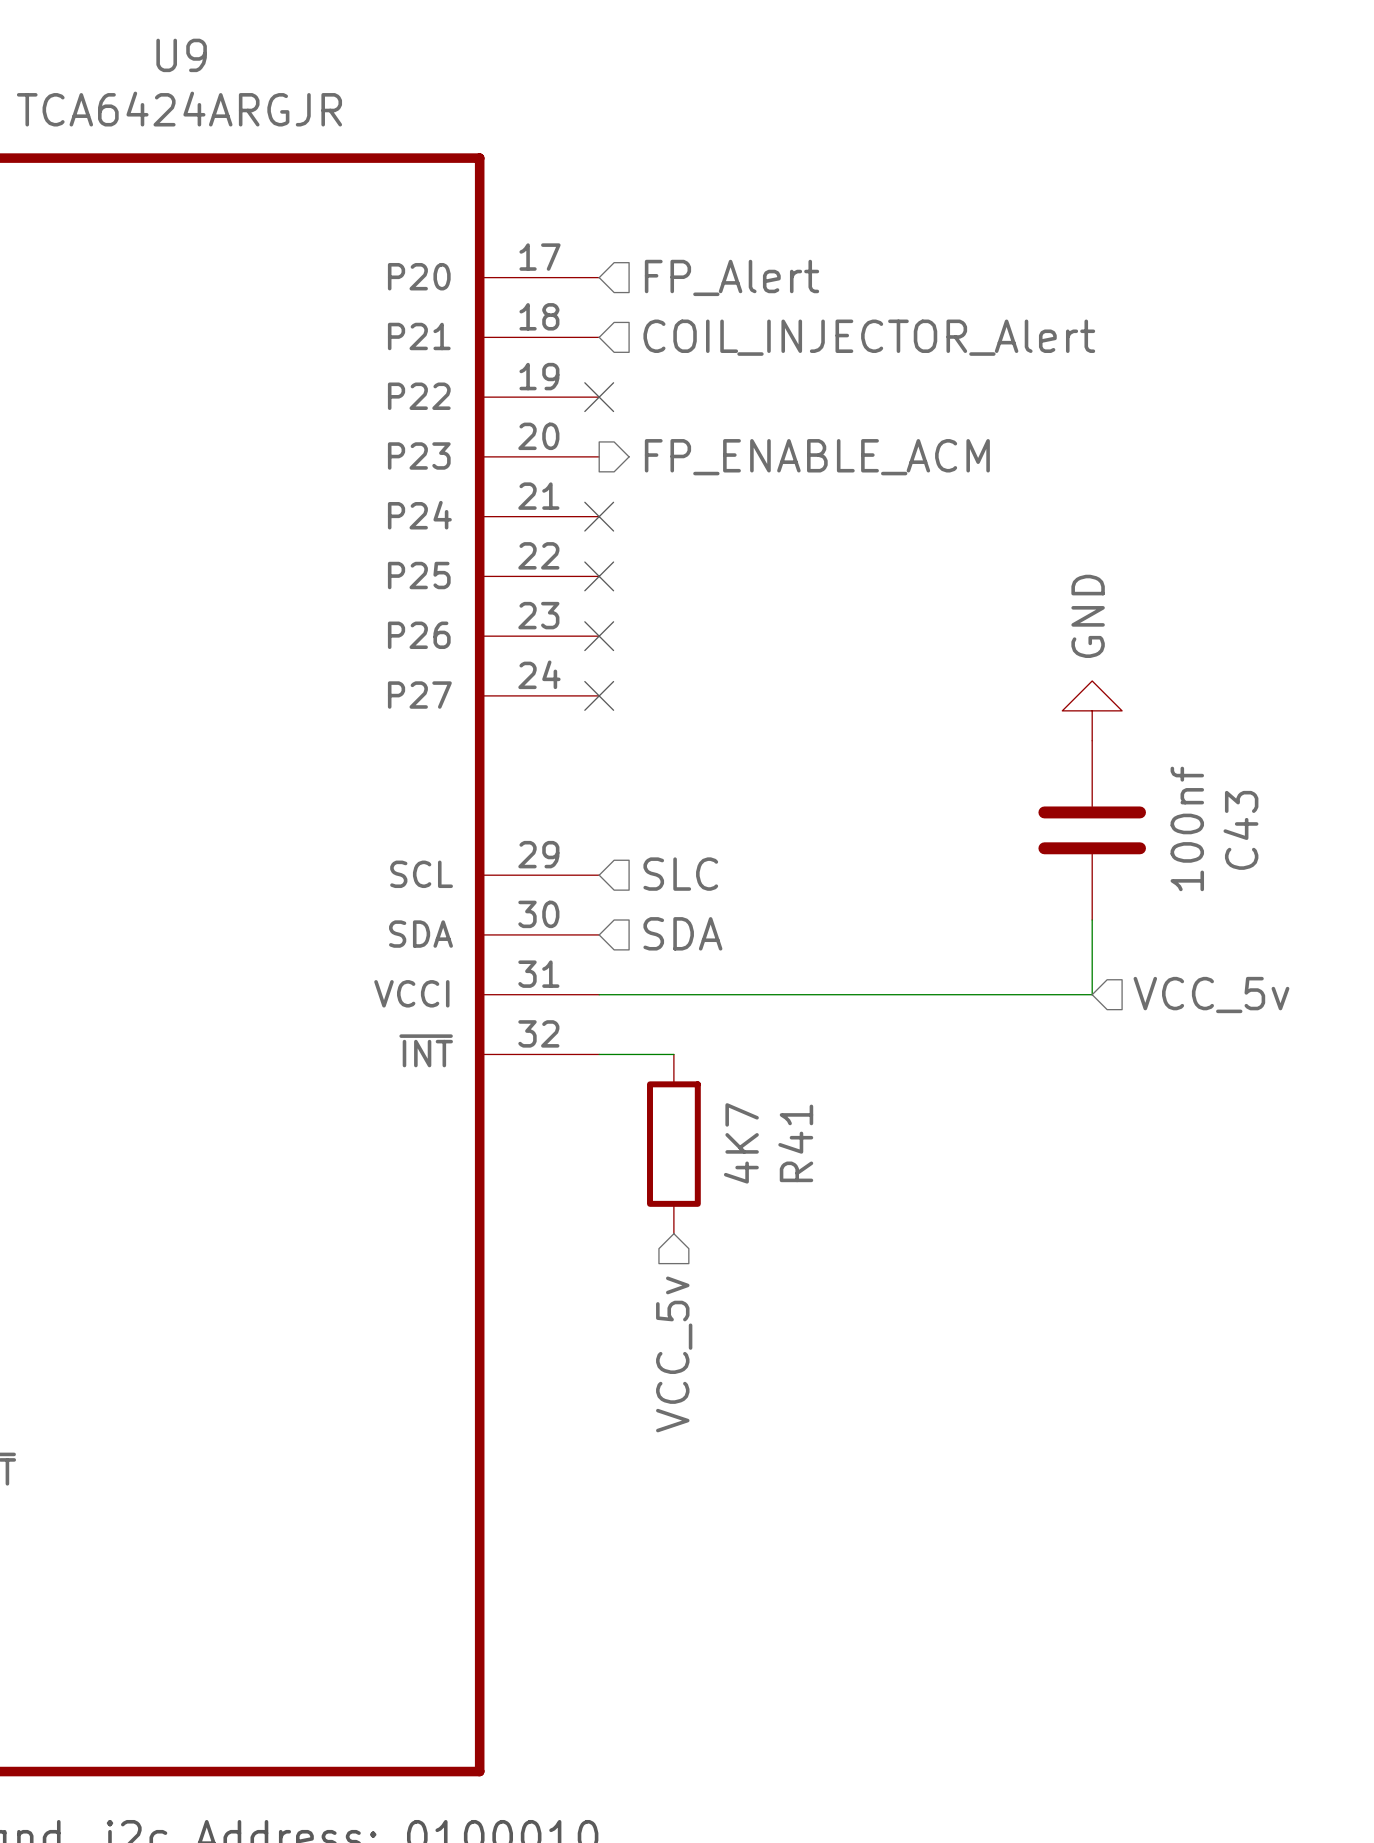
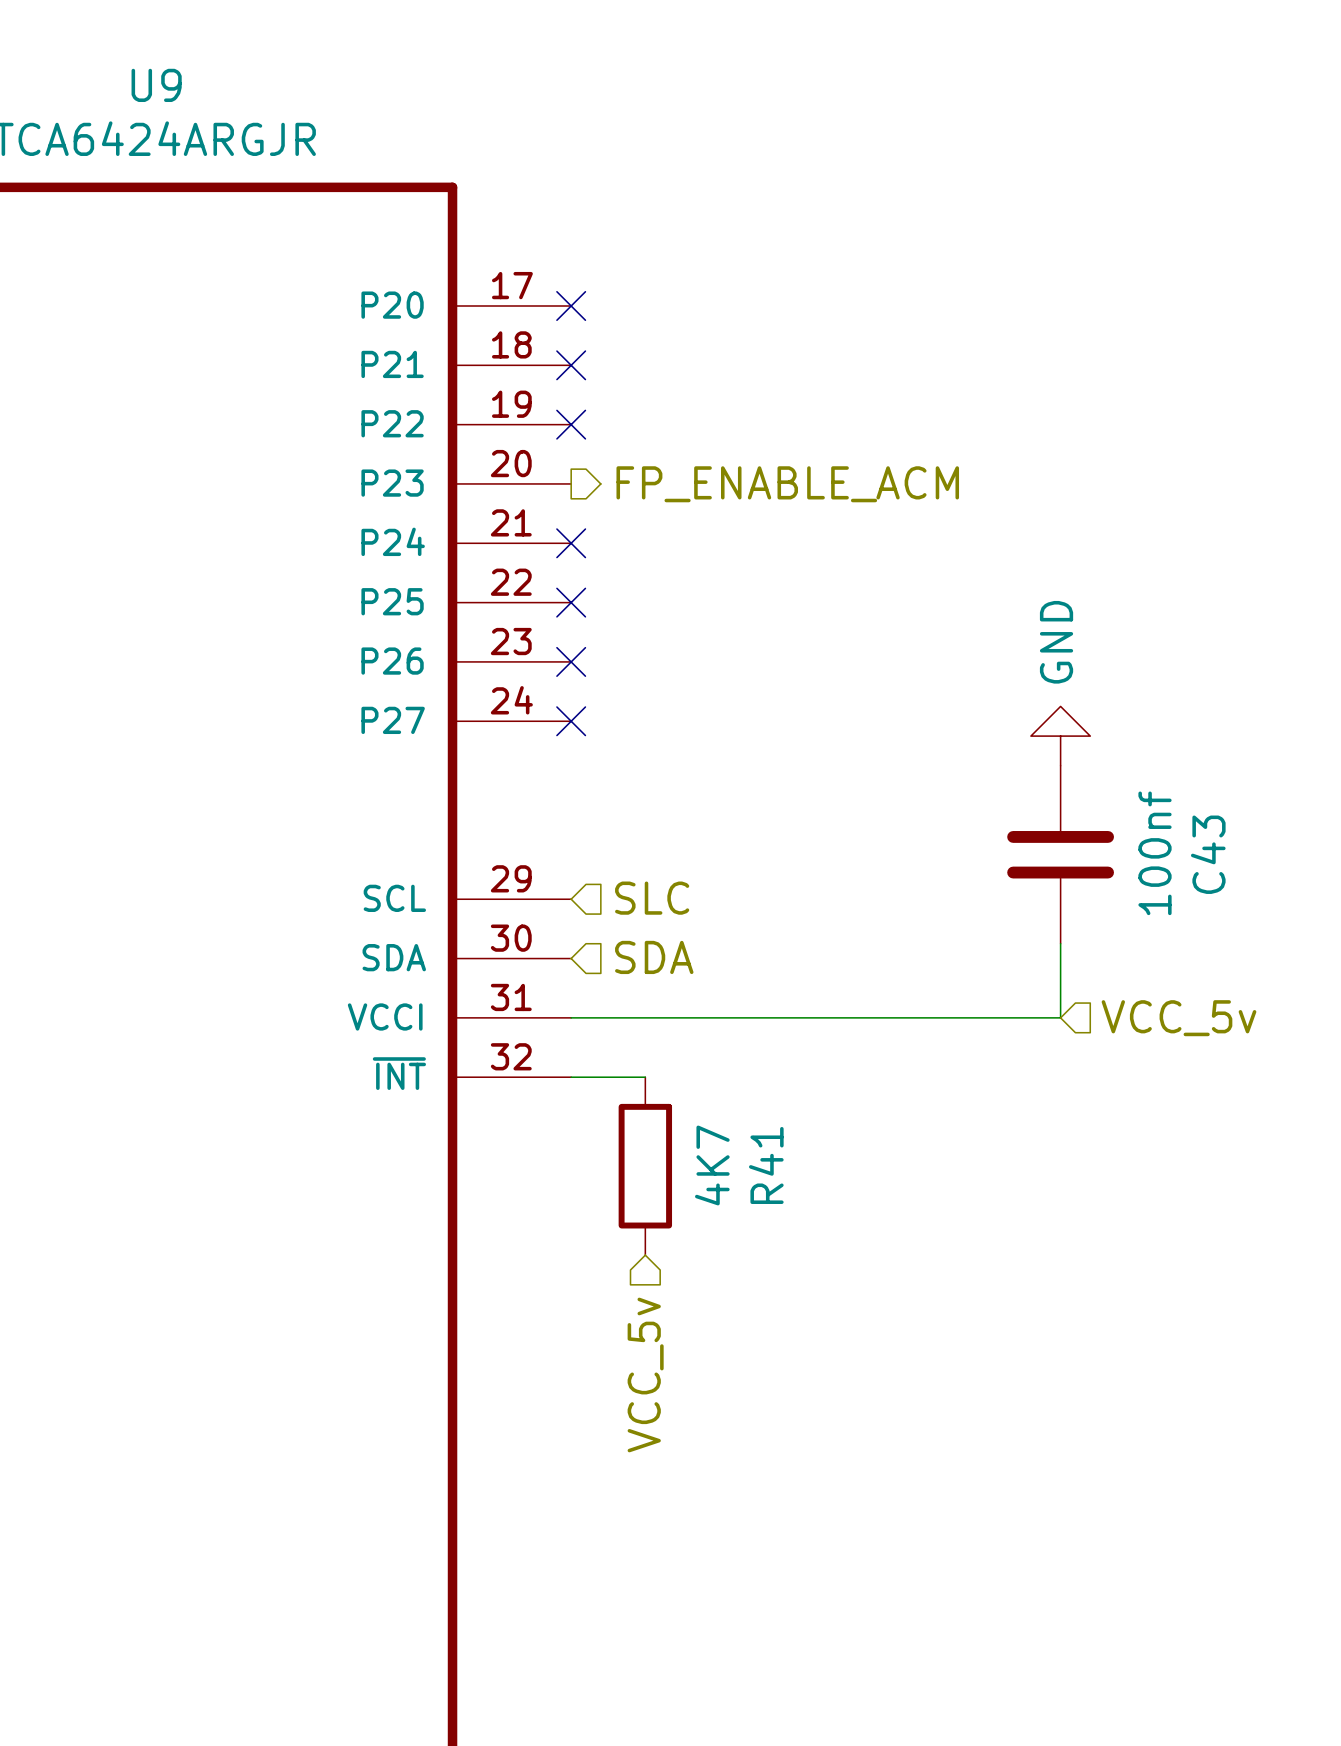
no-connect mark: none -> (571, 306)
hierarchical label: FP_Alert (731, 277) -> none
no-connect mark: none -> (571, 365)
hierarchical label: COIL_INJECTOR_Alert (869, 337) -> none

